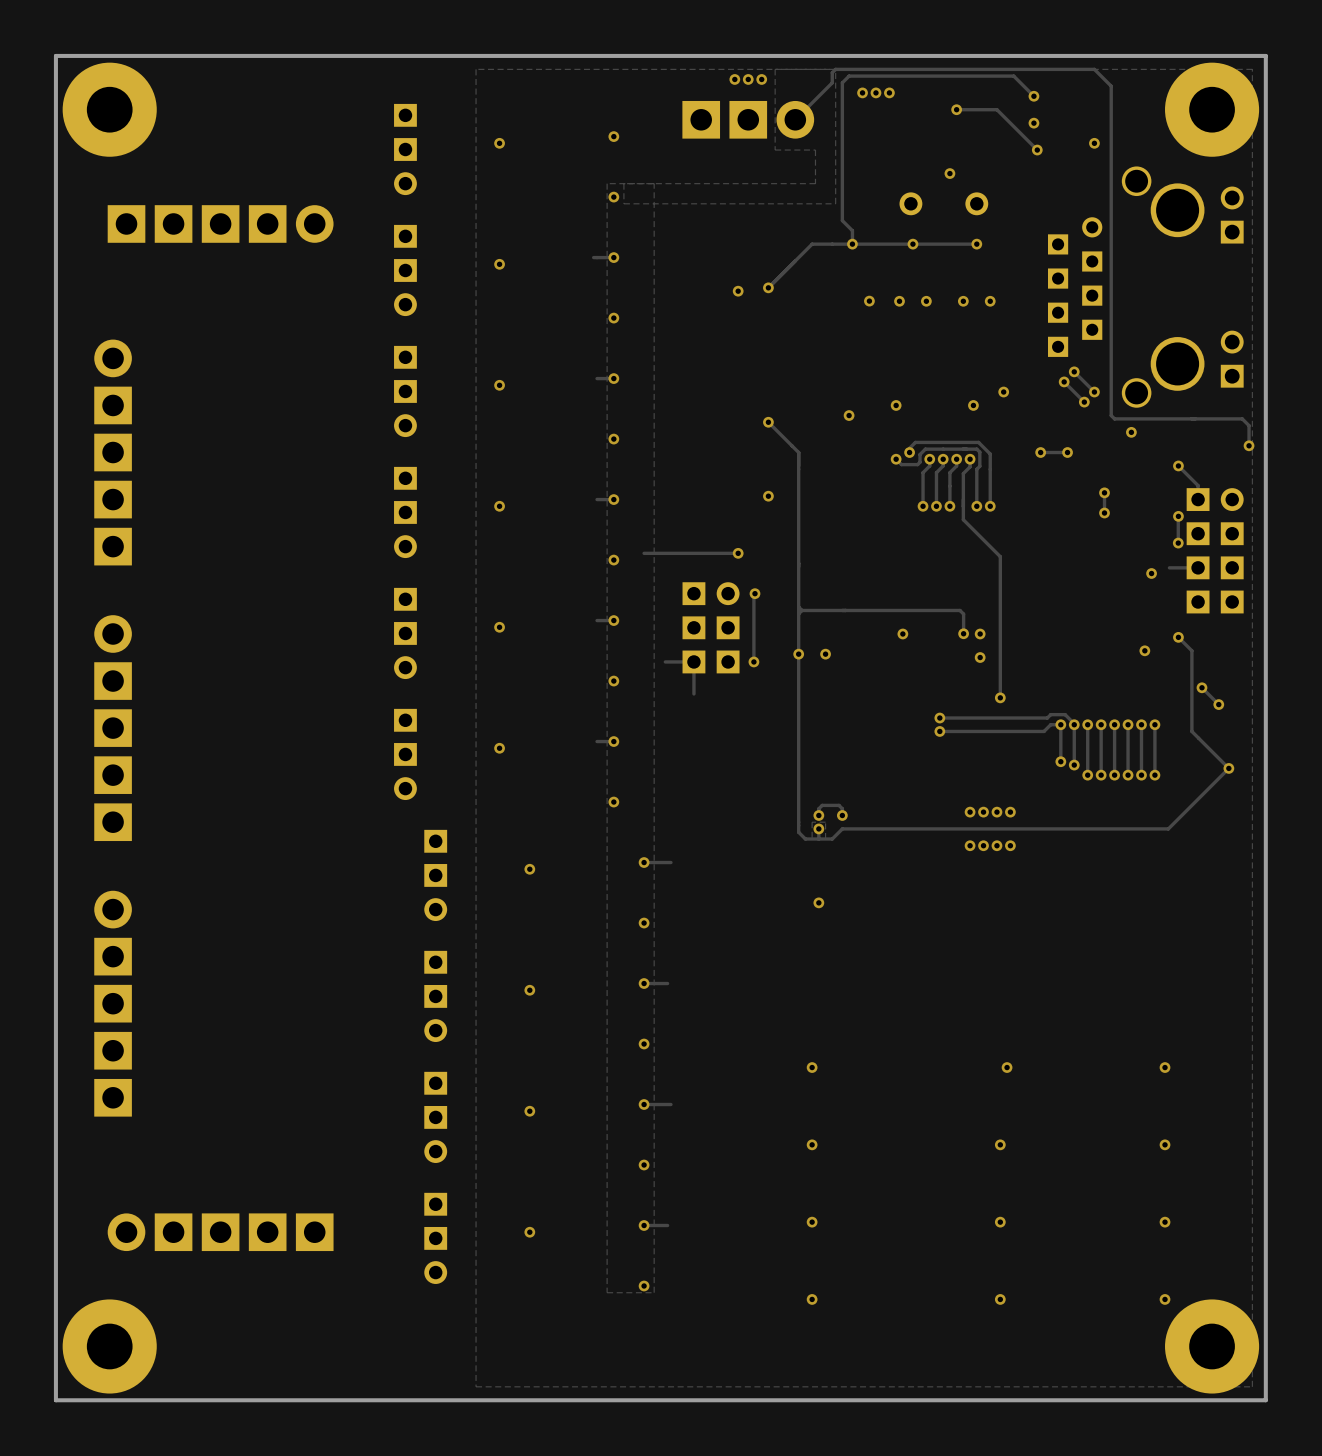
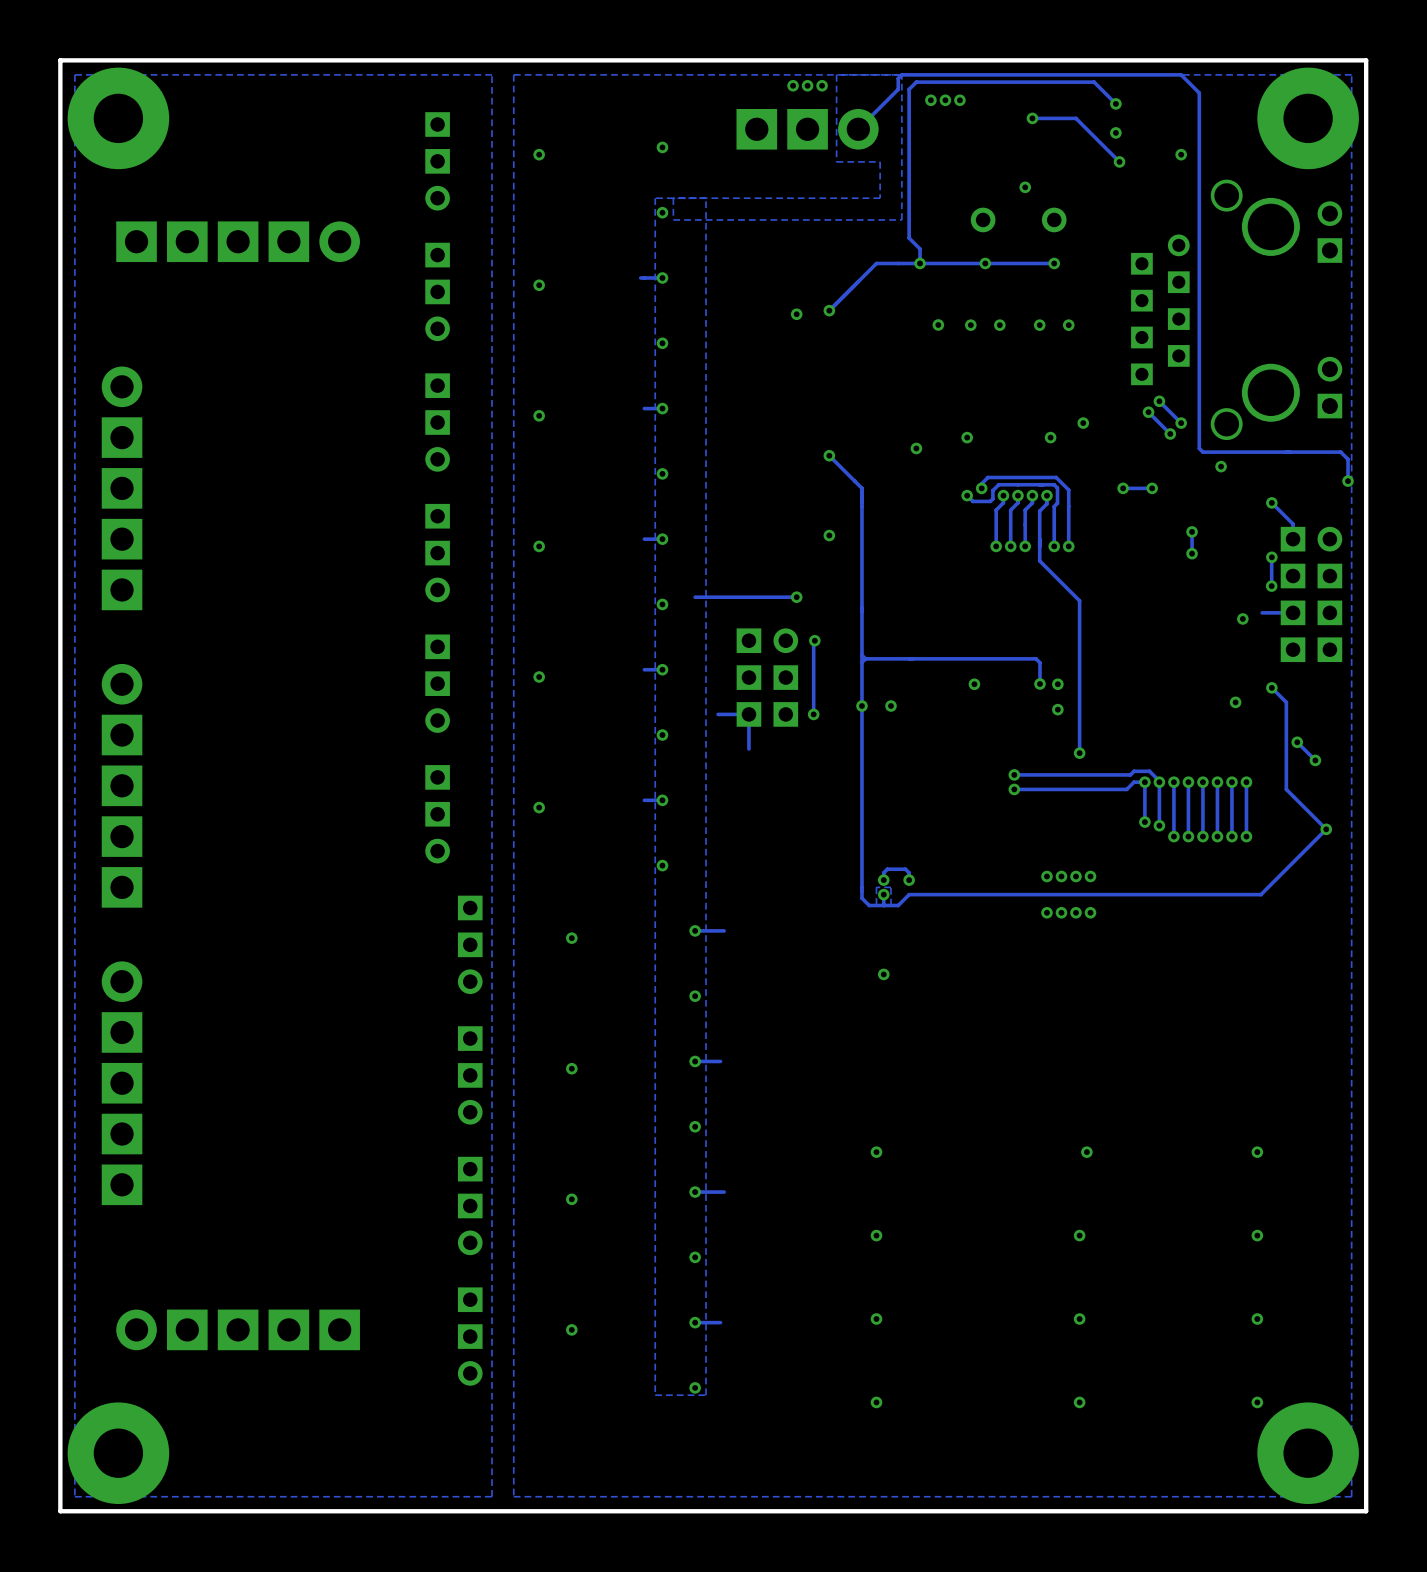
zone outline: none -> (492, 74) (492, 1496) (74, 1496) (74, 74) (492, 74)

